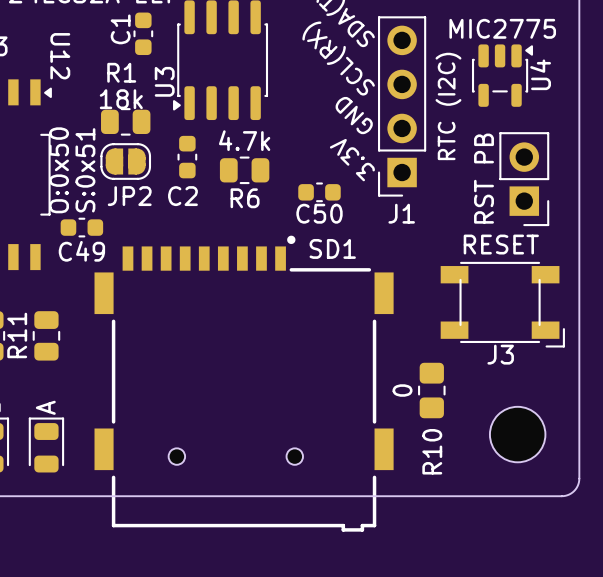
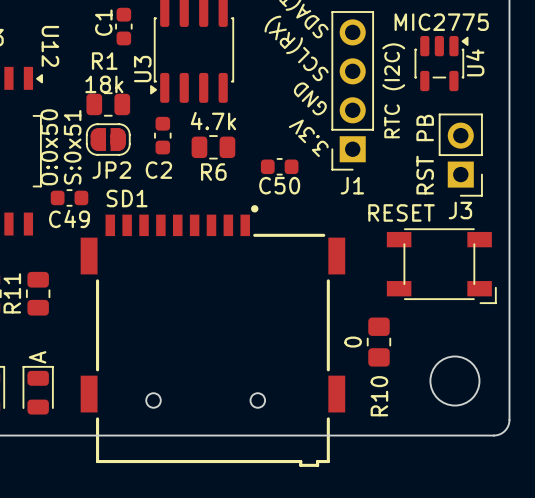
part text position: RESET (501, 244) -> RESET (401, 212)
SD1 name position: SD1 (332, 248) -> SD1 (127, 198)
J3 name position: J3 (500, 354) -> J3 (460, 210)

